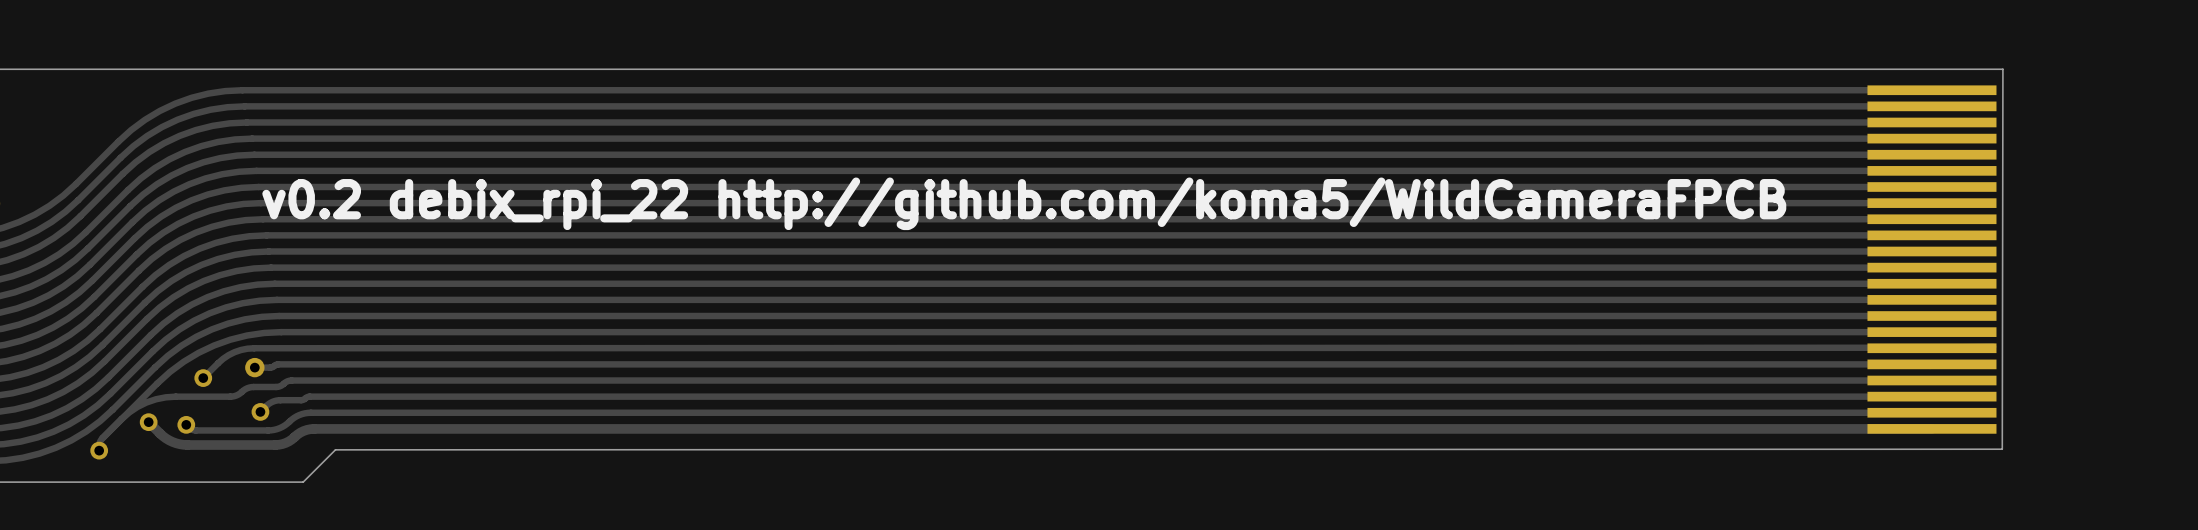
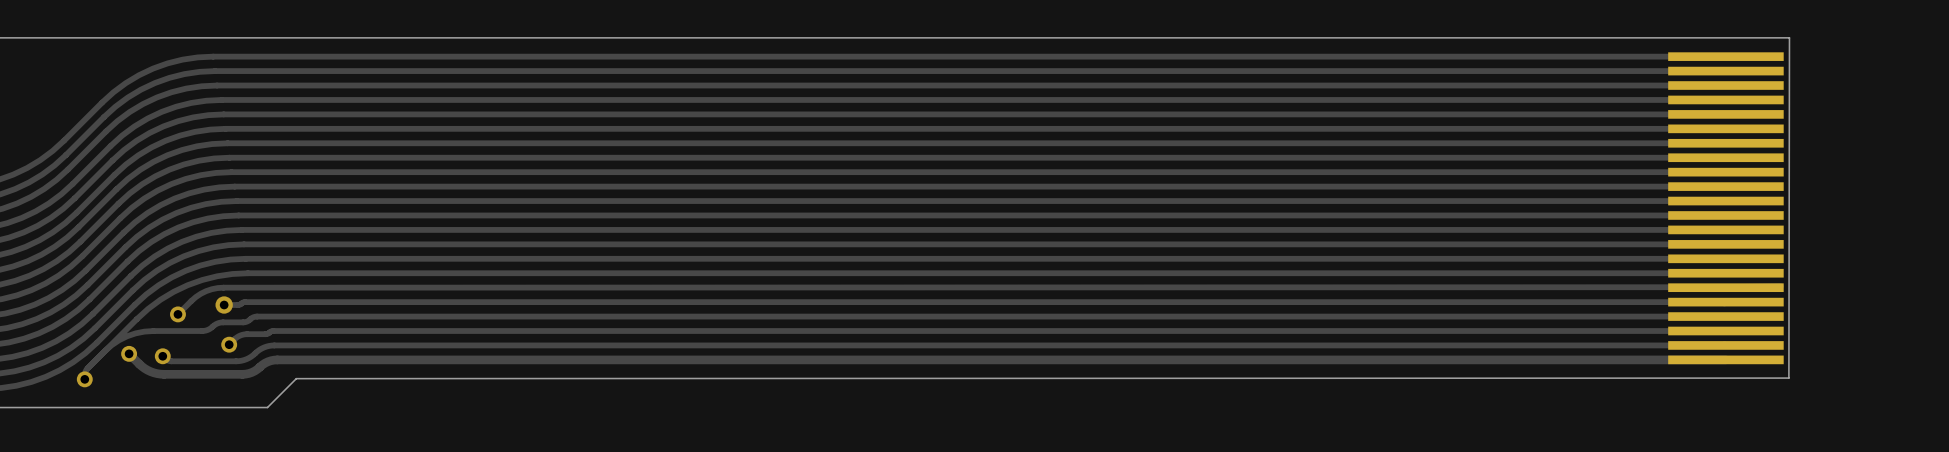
text: v0.2 debix_rpi_22 http://github.com/koma5/WildCameraFPCB (1024, 203) -> none

